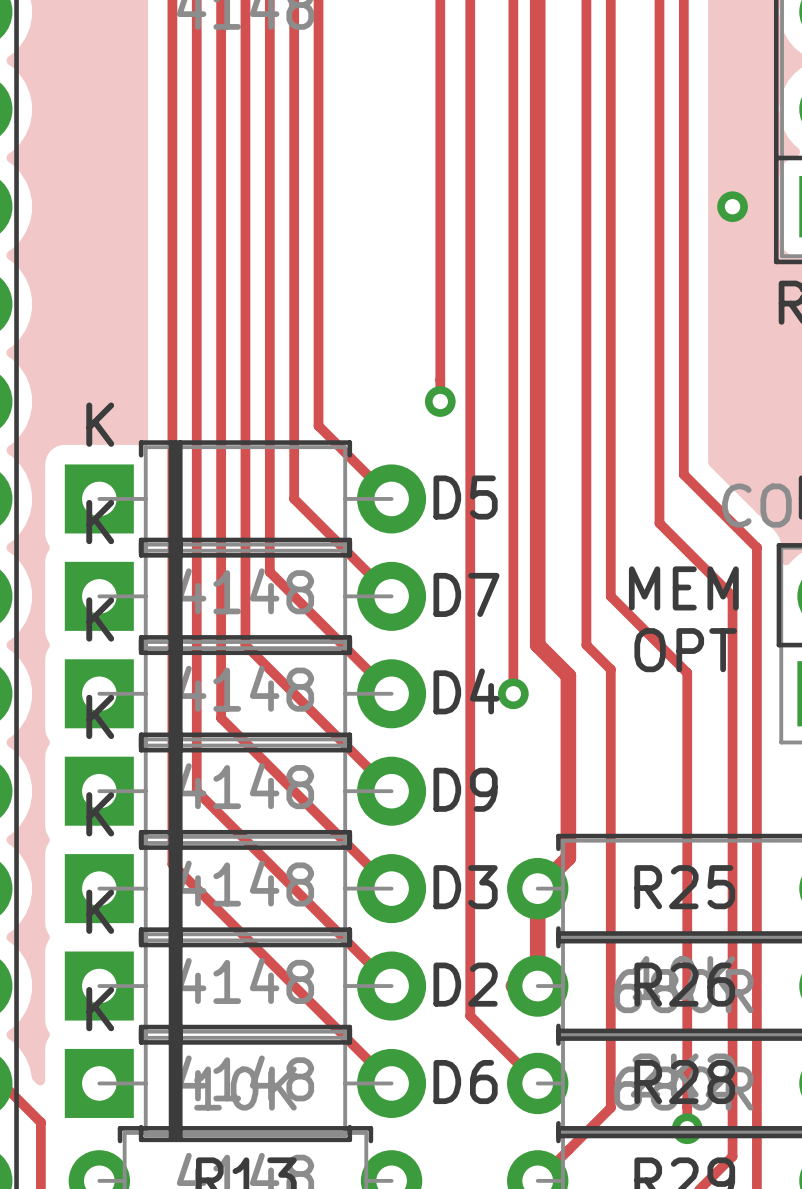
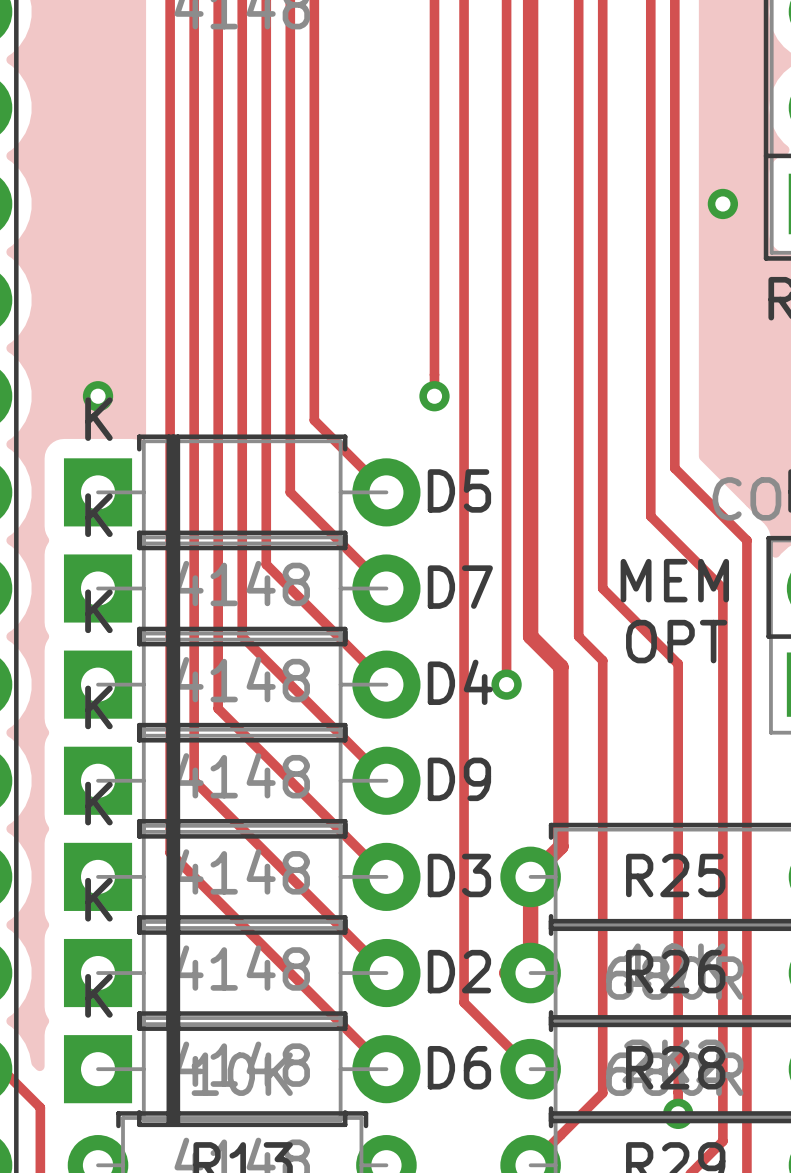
via: none -> (98, 396)

